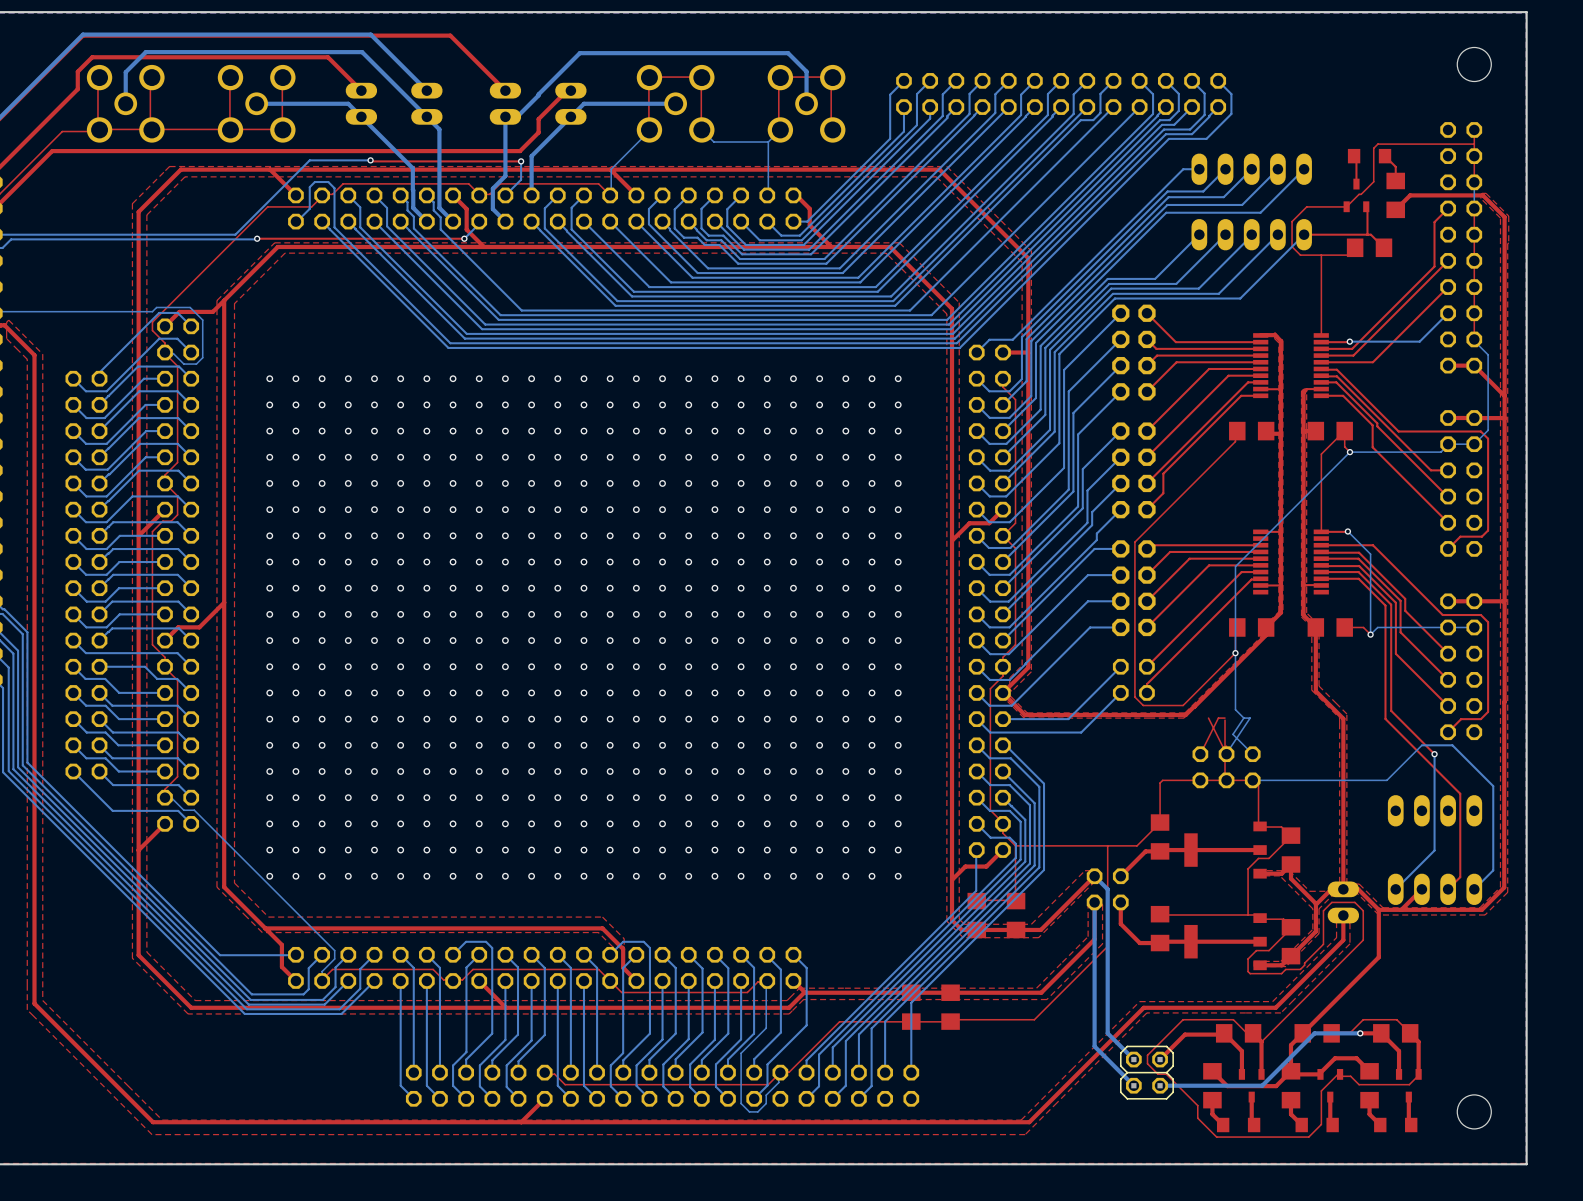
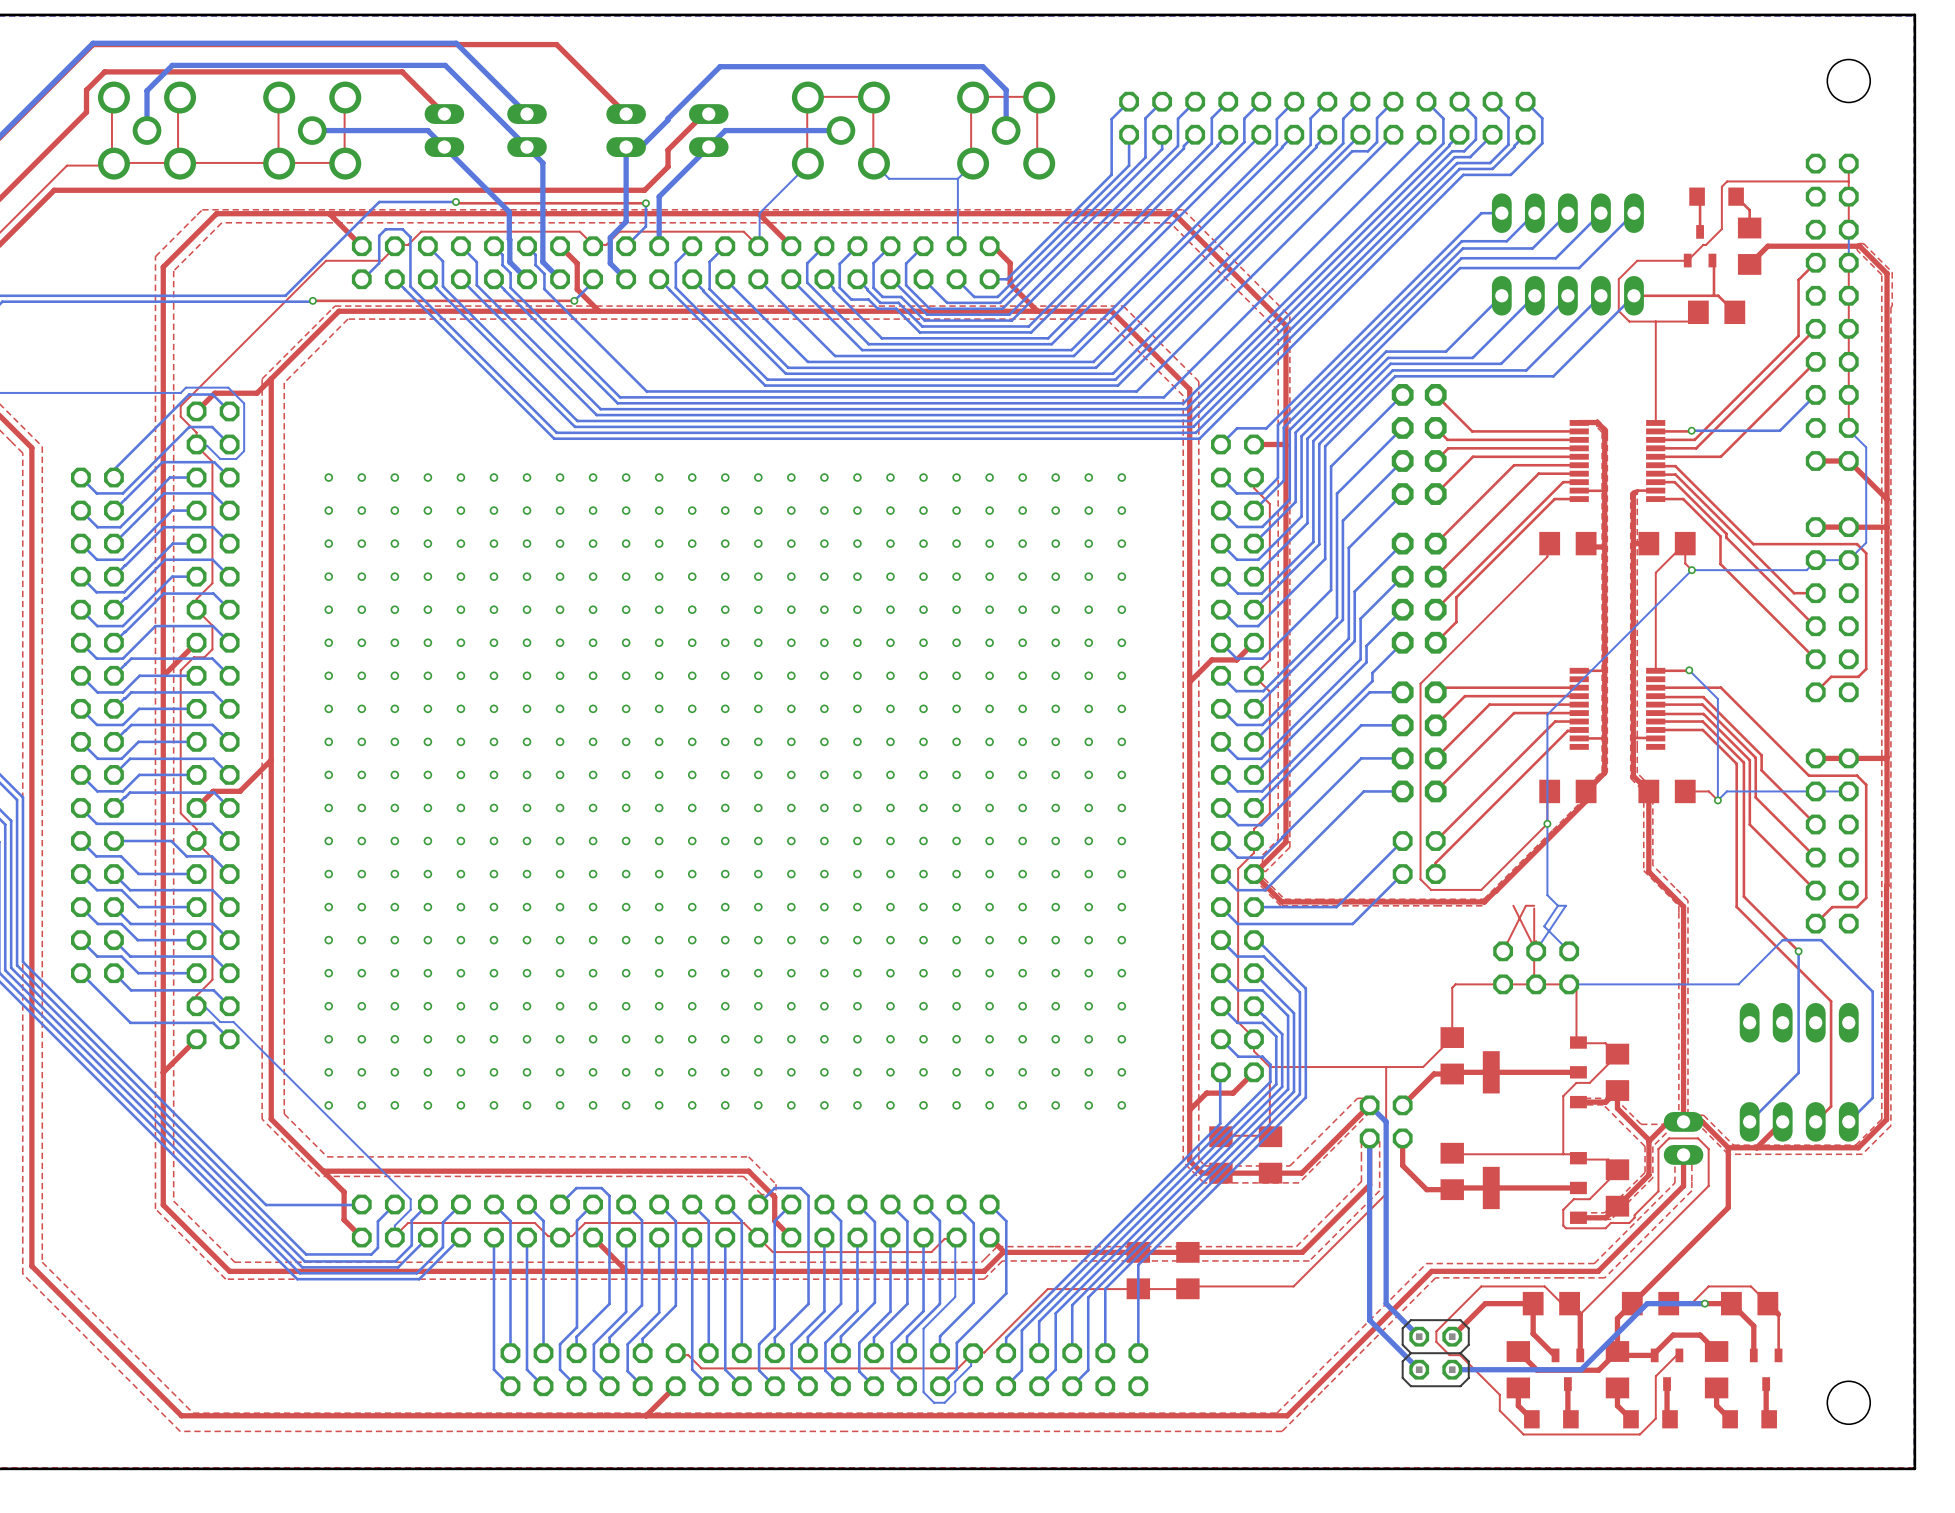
top track: (1224, 1033) (1241, 1051) (1241, 1074) -> none
top track: (1225, 1034) (1185, 1034) -> (1555, 1356) (1533, 1333) (1533, 1303) (1485, 1303) (1483, 1305)
top track: (1418, 1041) (1418, 1074) (1409, 1084) (1359, 1084) (1350, 1076) (1340, 1076) (1338, 1074) -> (1778, 1314) (1778, 1356)

